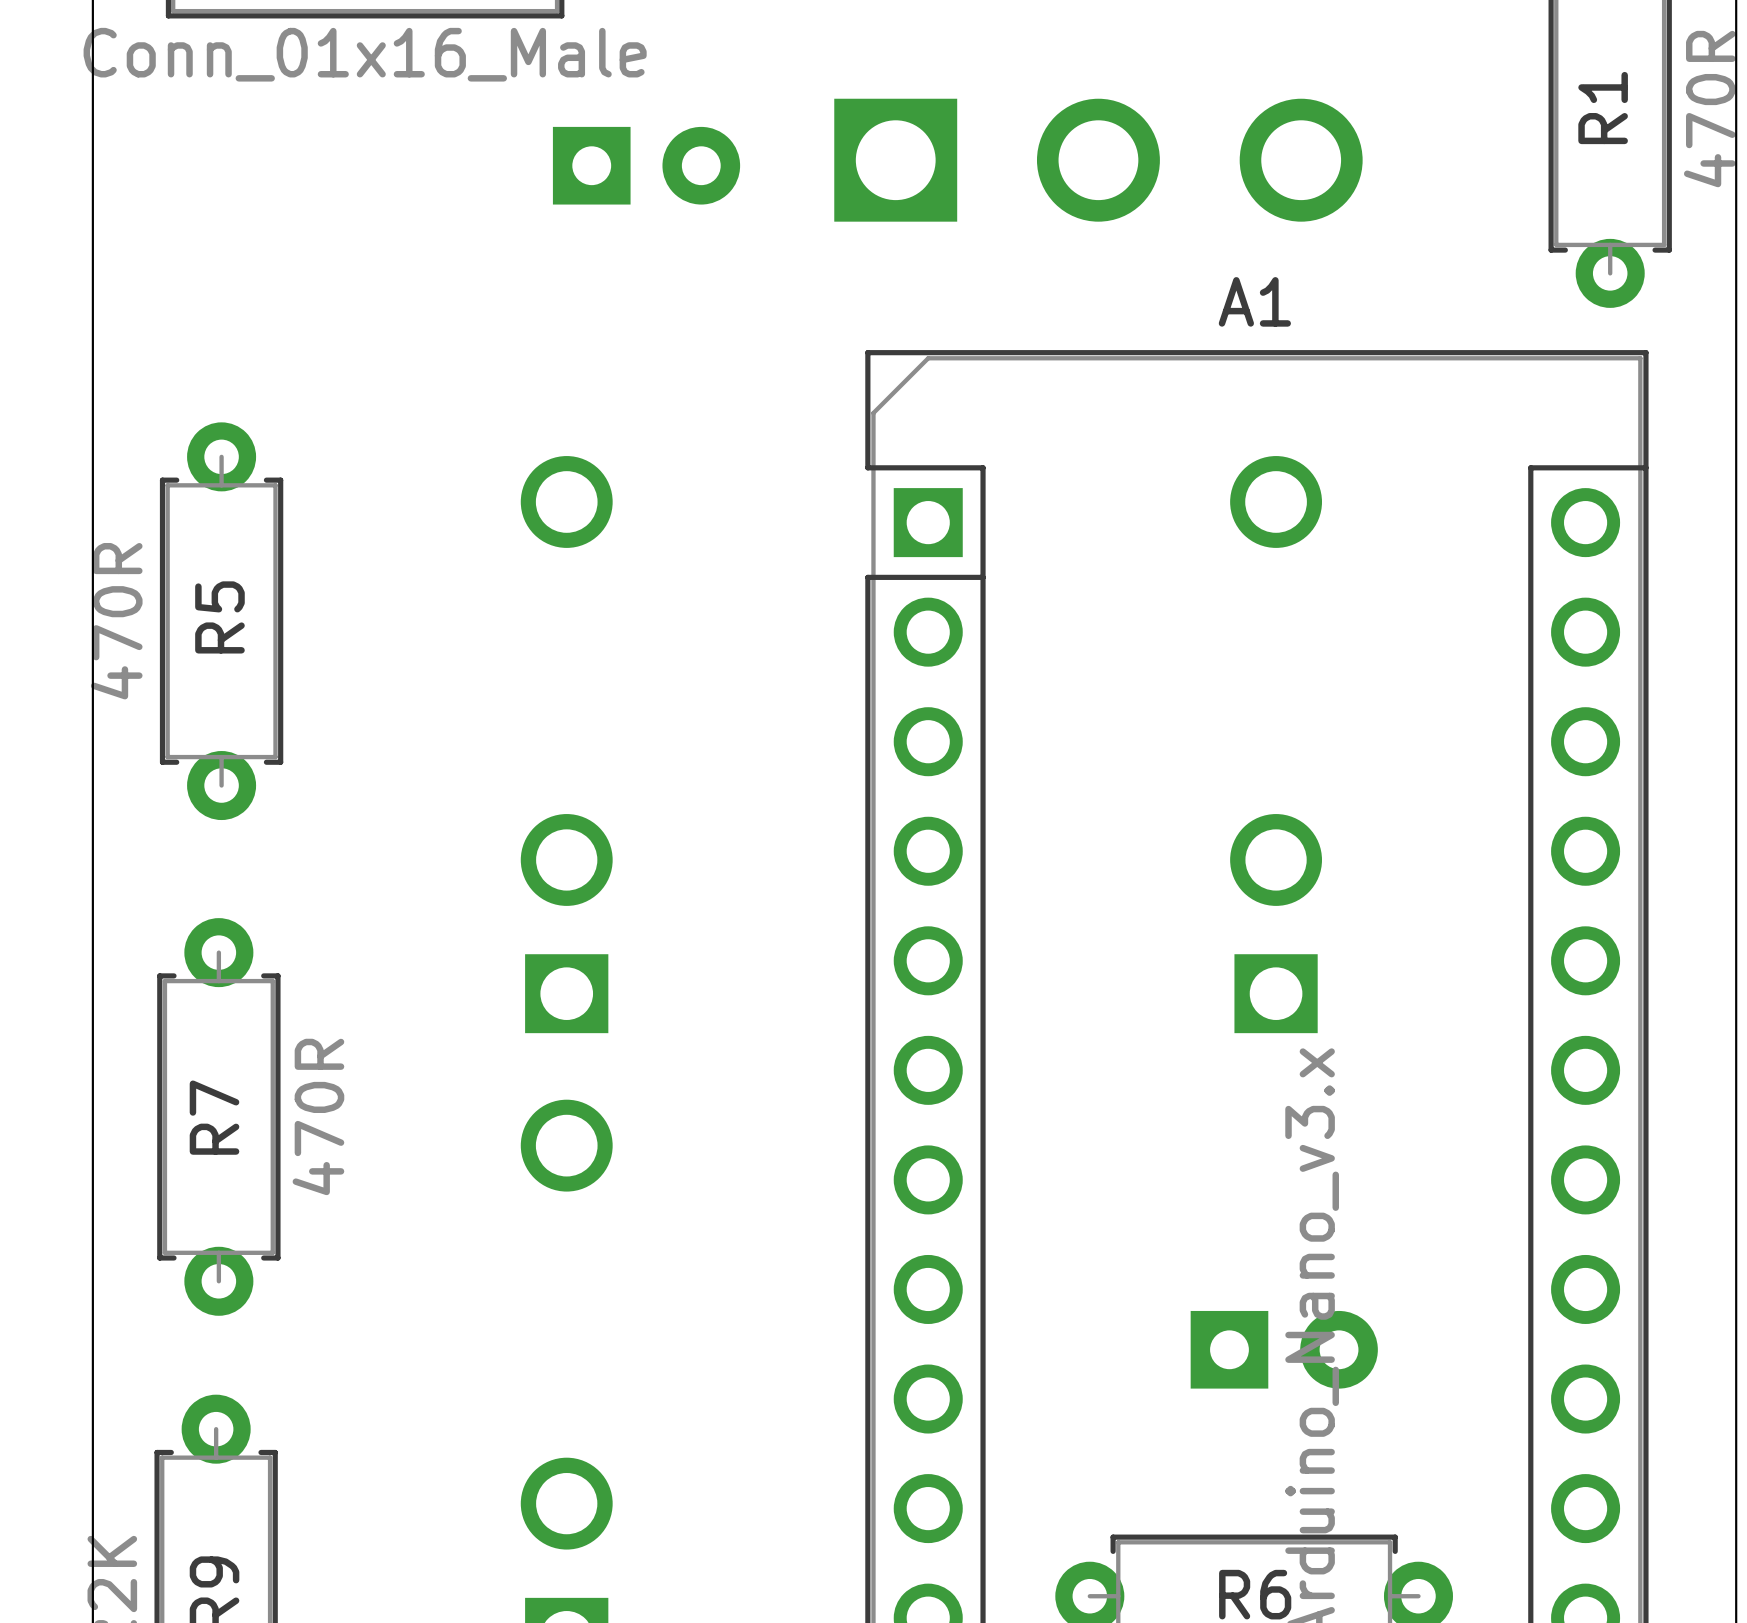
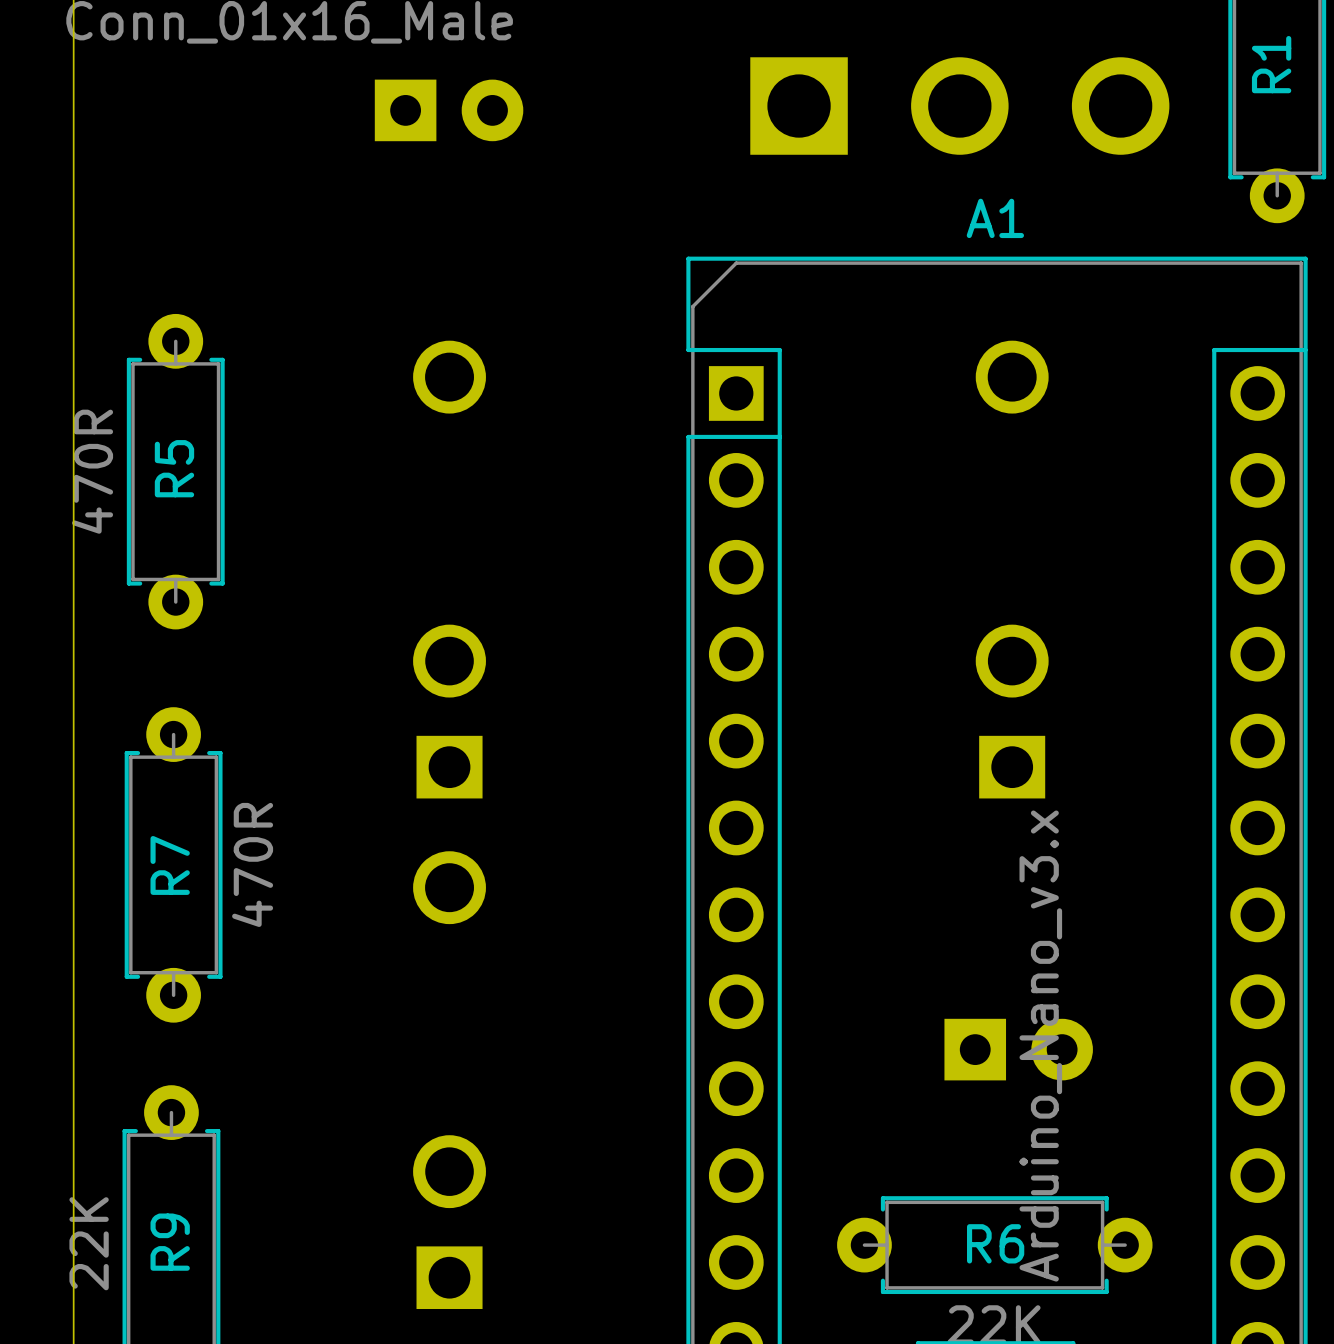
part position: (1098, 160) -> (959, 106)
part position: (646, 165) -> (449, 110)

